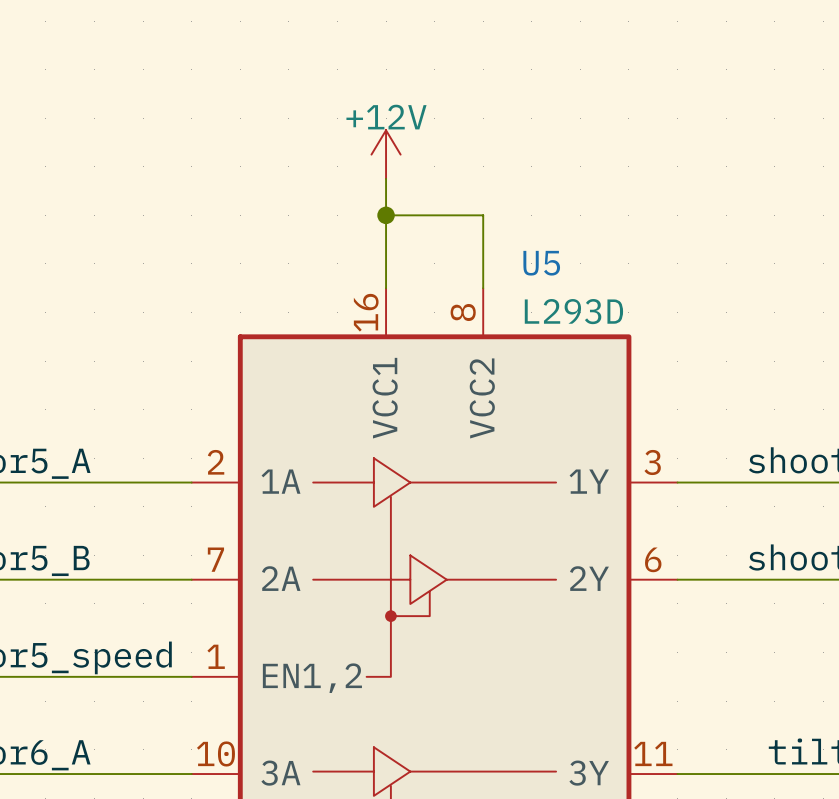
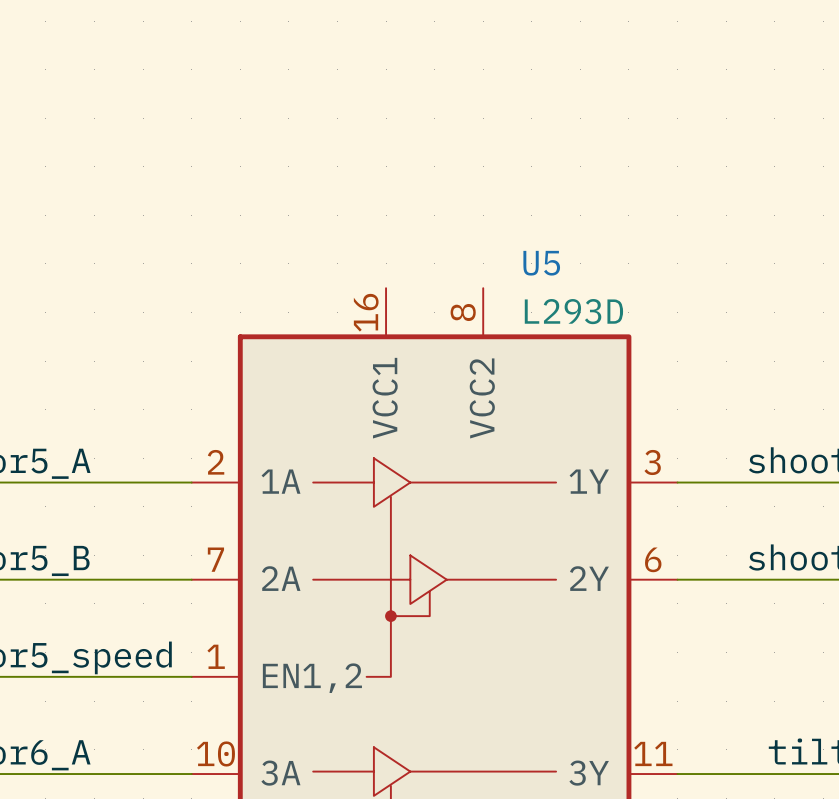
power symbol: +12V (386, 154) -> none
wire: (386, 178) (386, 288) -> none
wire: (386, 215) (483, 215) (483, 288) -> none
junction: (386, 215) -> none

